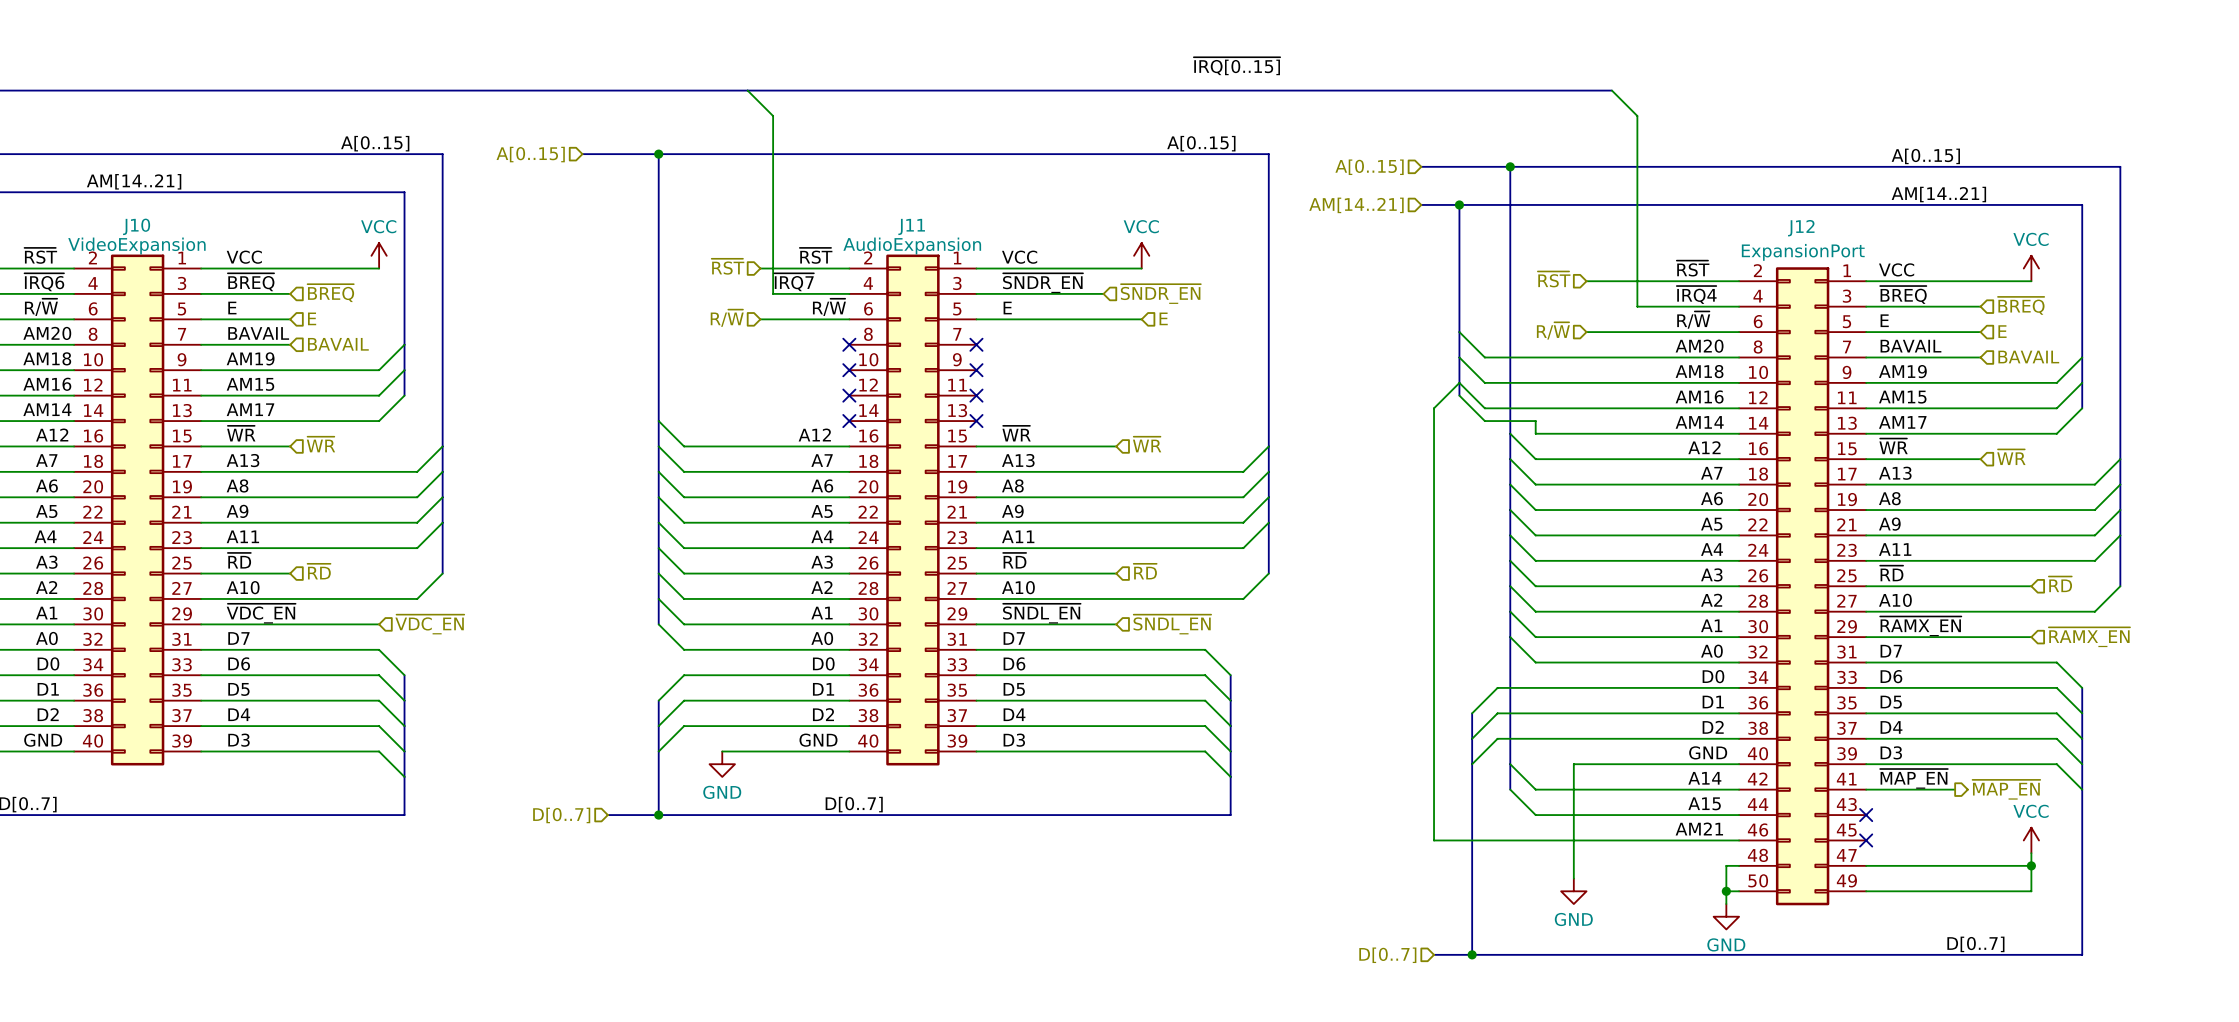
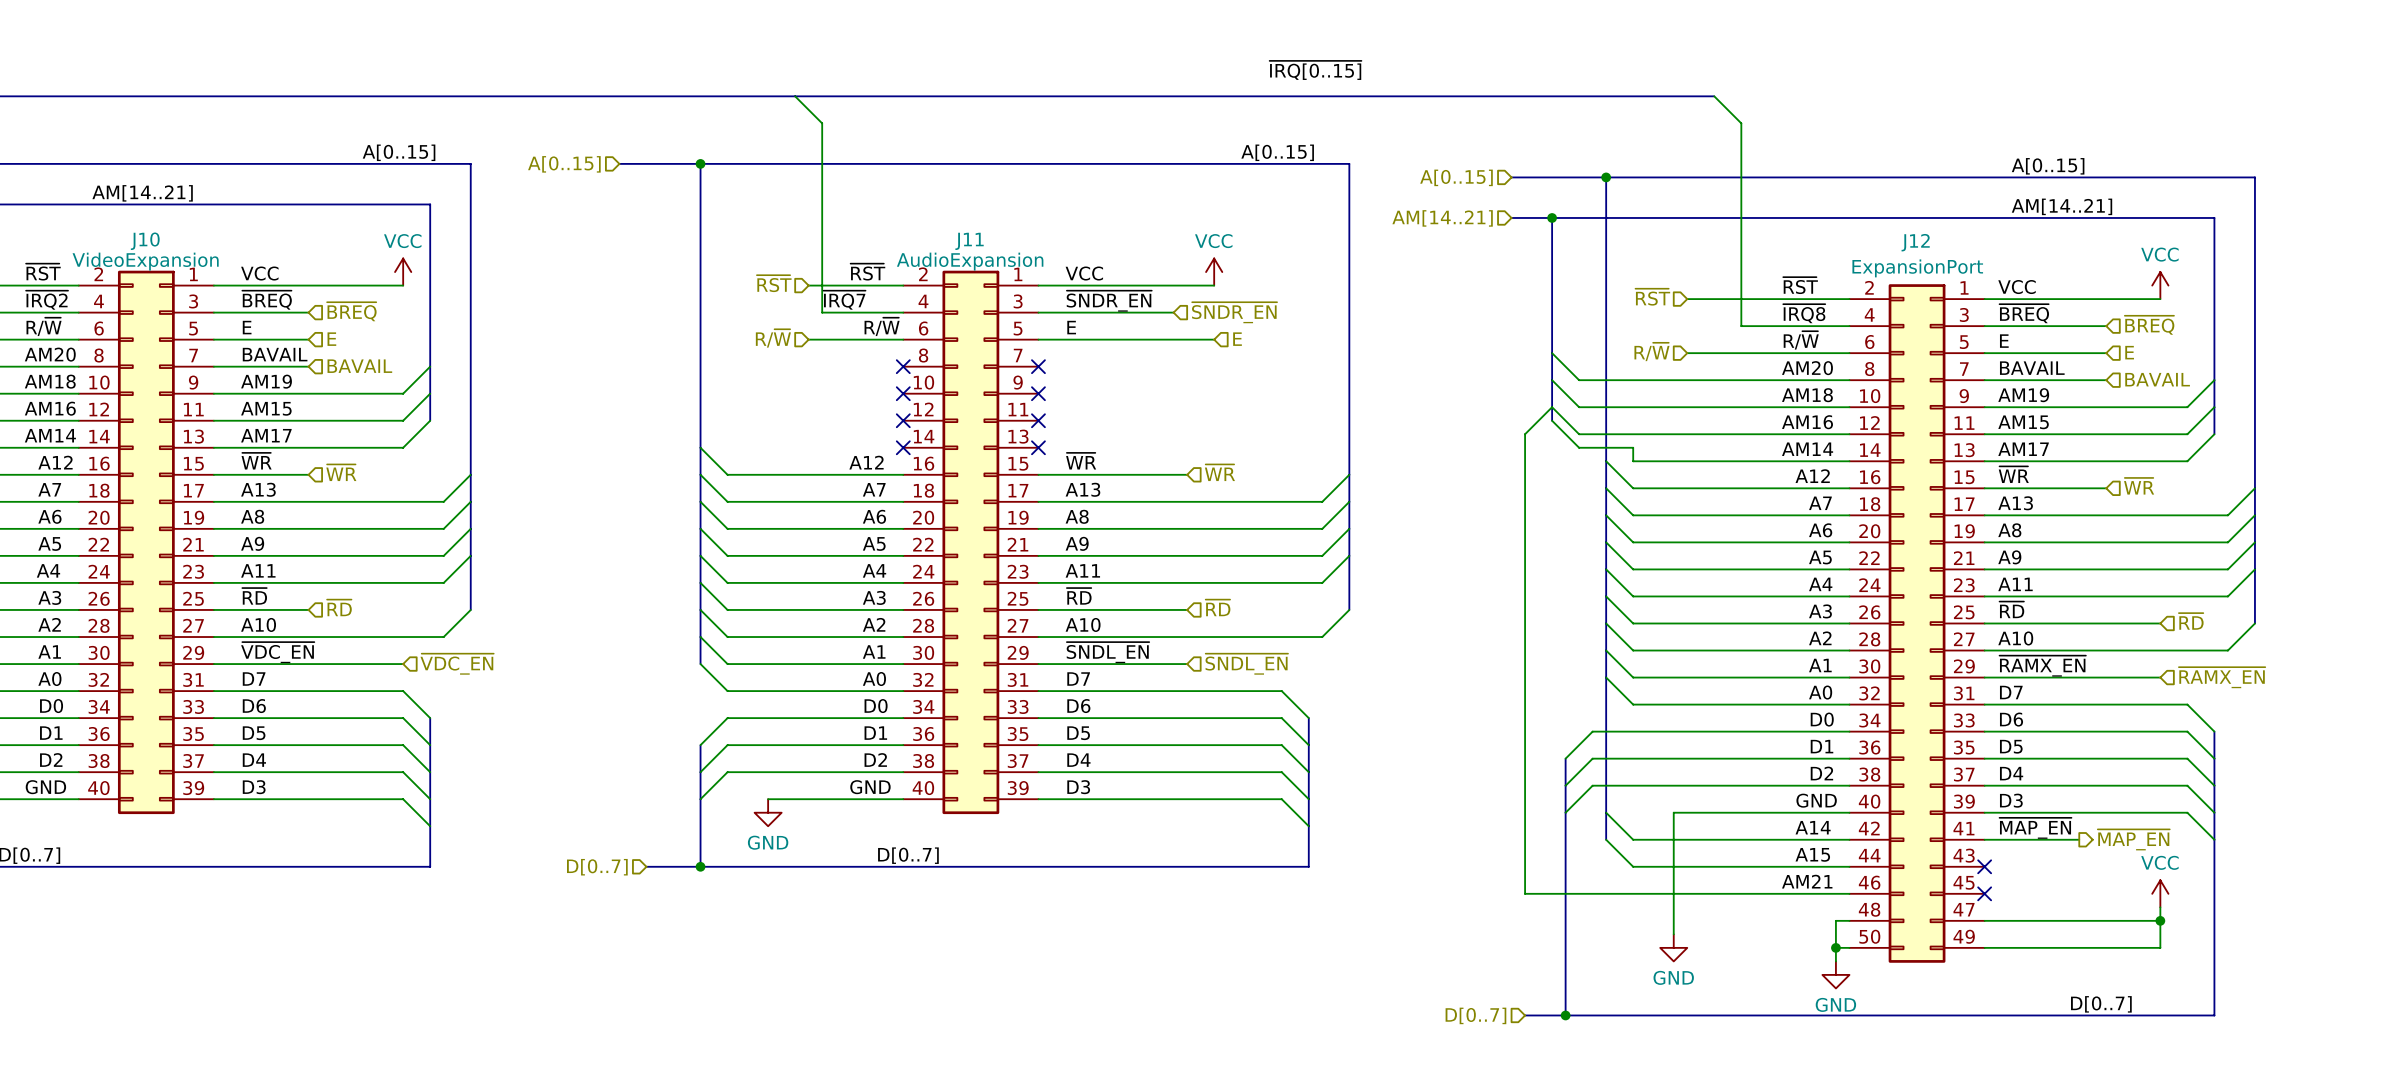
label: ~{IRQ6} (44, 282) -> ~{IRQ2} (47, 300)
label: ~{IRQ4} (1696, 294) -> ~{IRQ8} (1804, 313)

